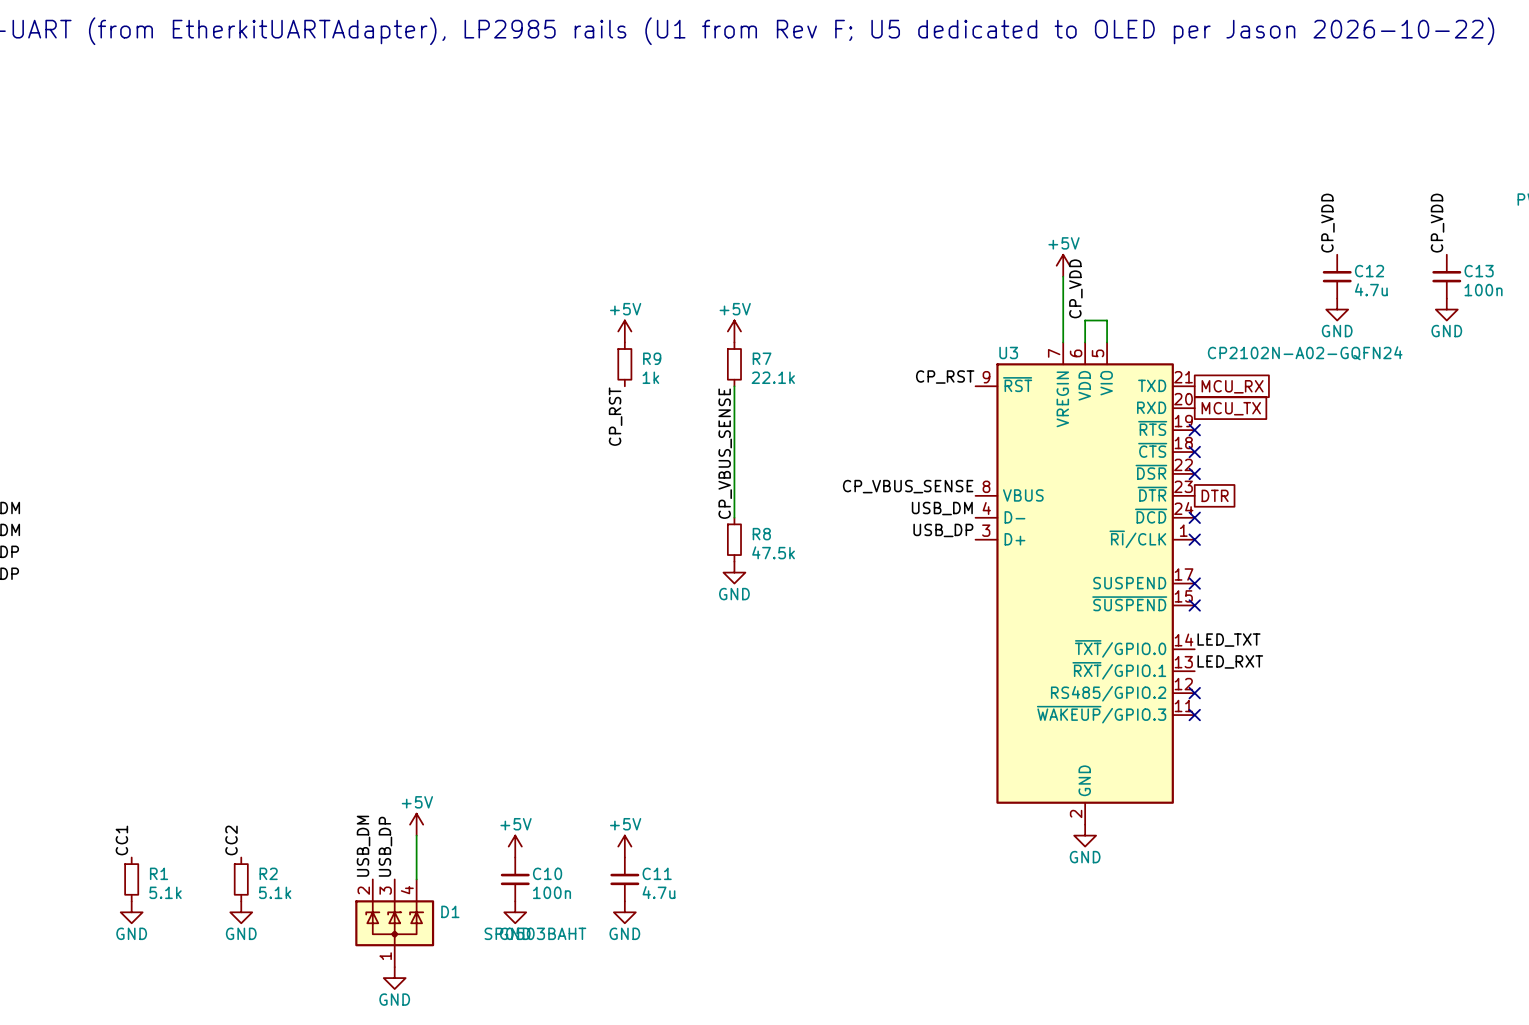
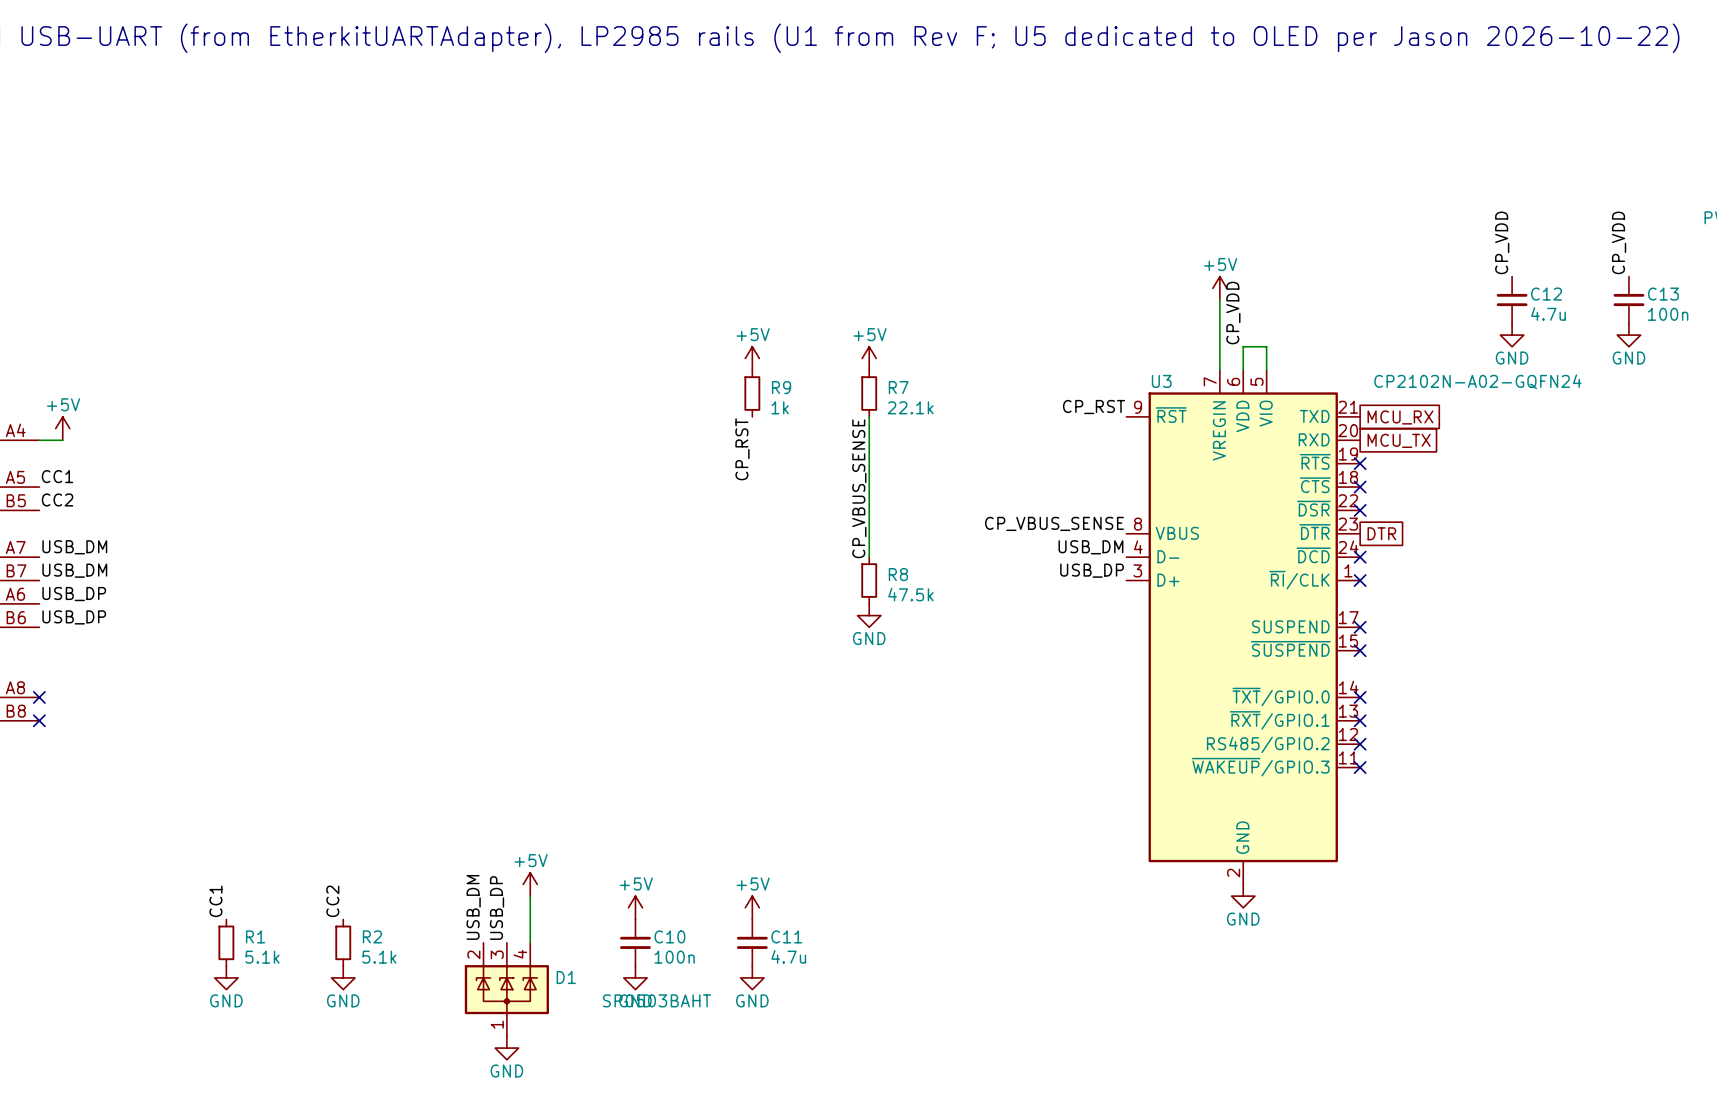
label: LED_TXT (1228, 640) -> none
no-connect mark: none -> (1360, 697)
label: LED_RXT (1230, 661) -> none
no-connect mark: none -> (1360, 720)

